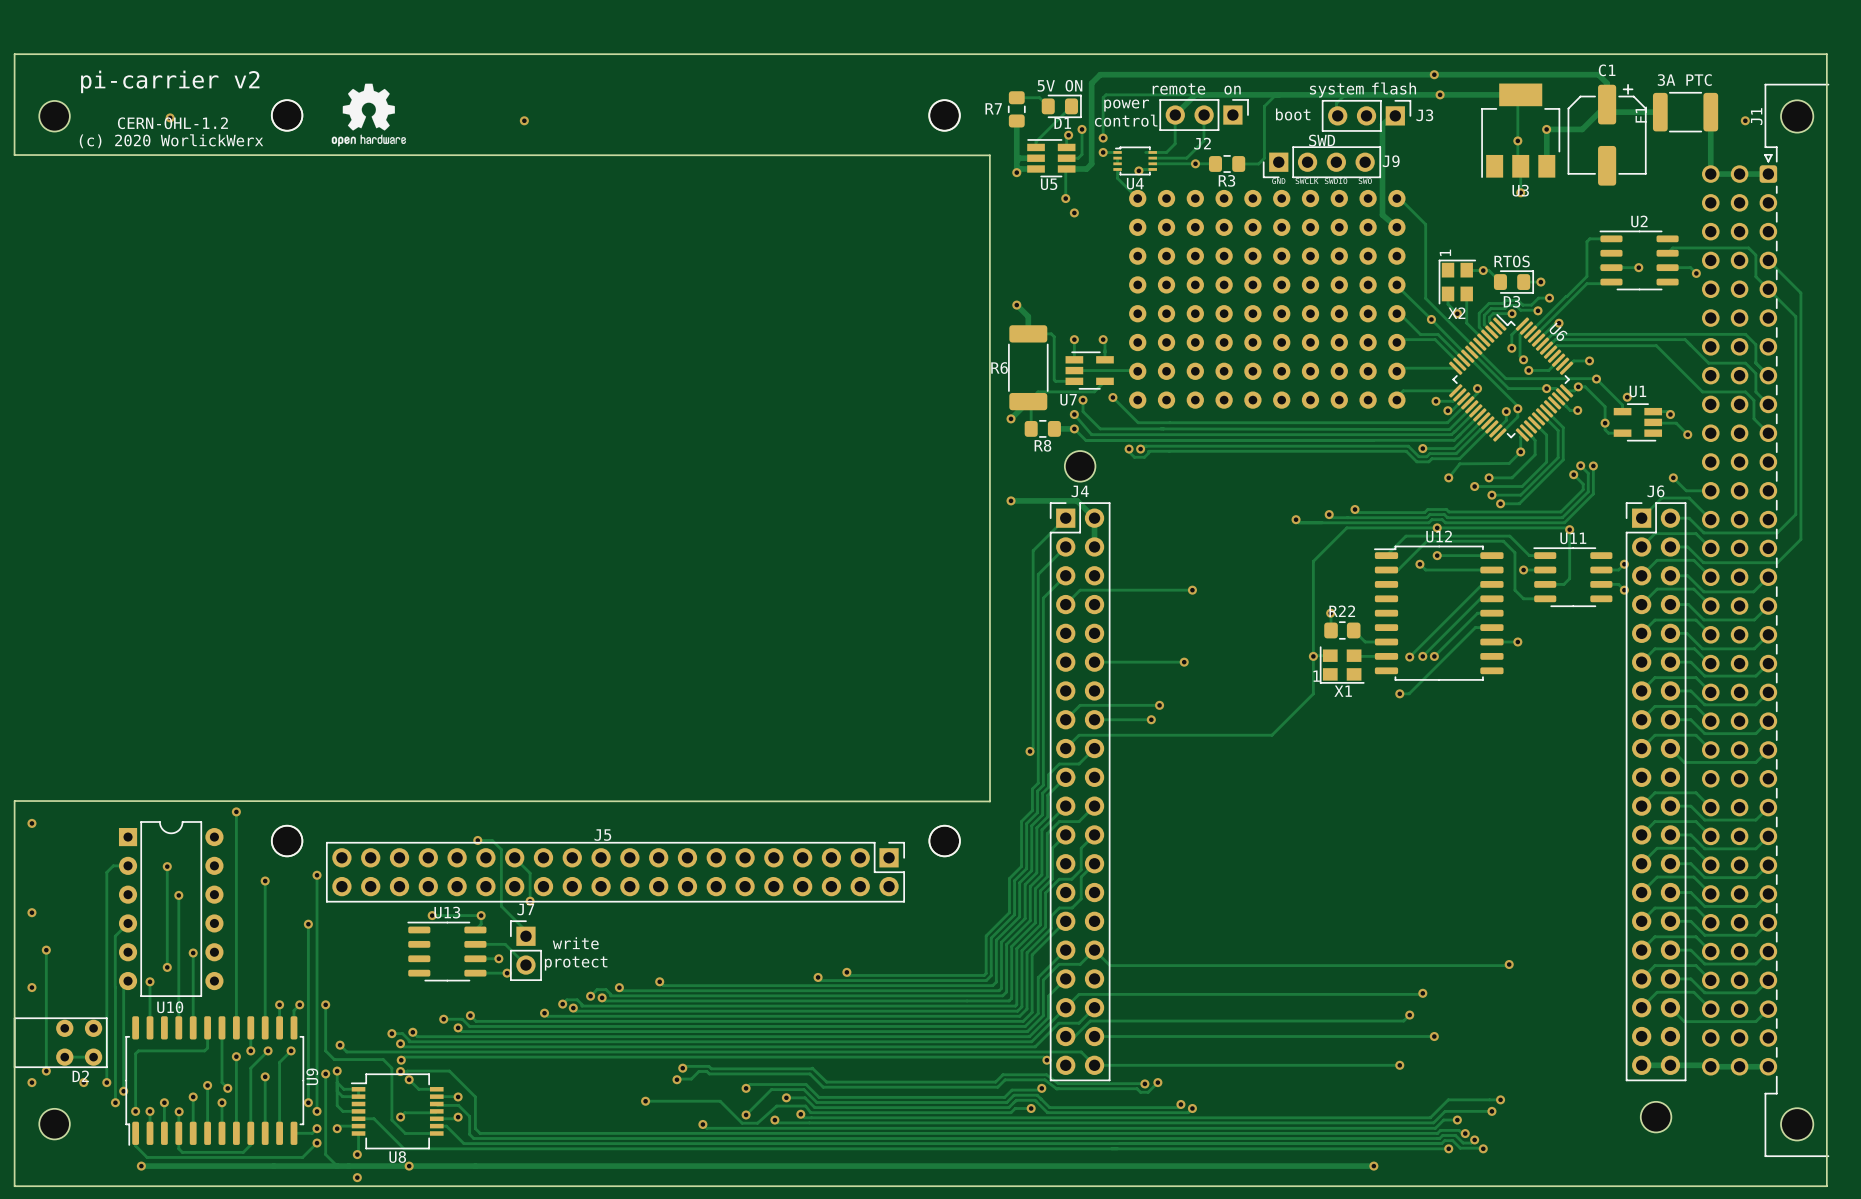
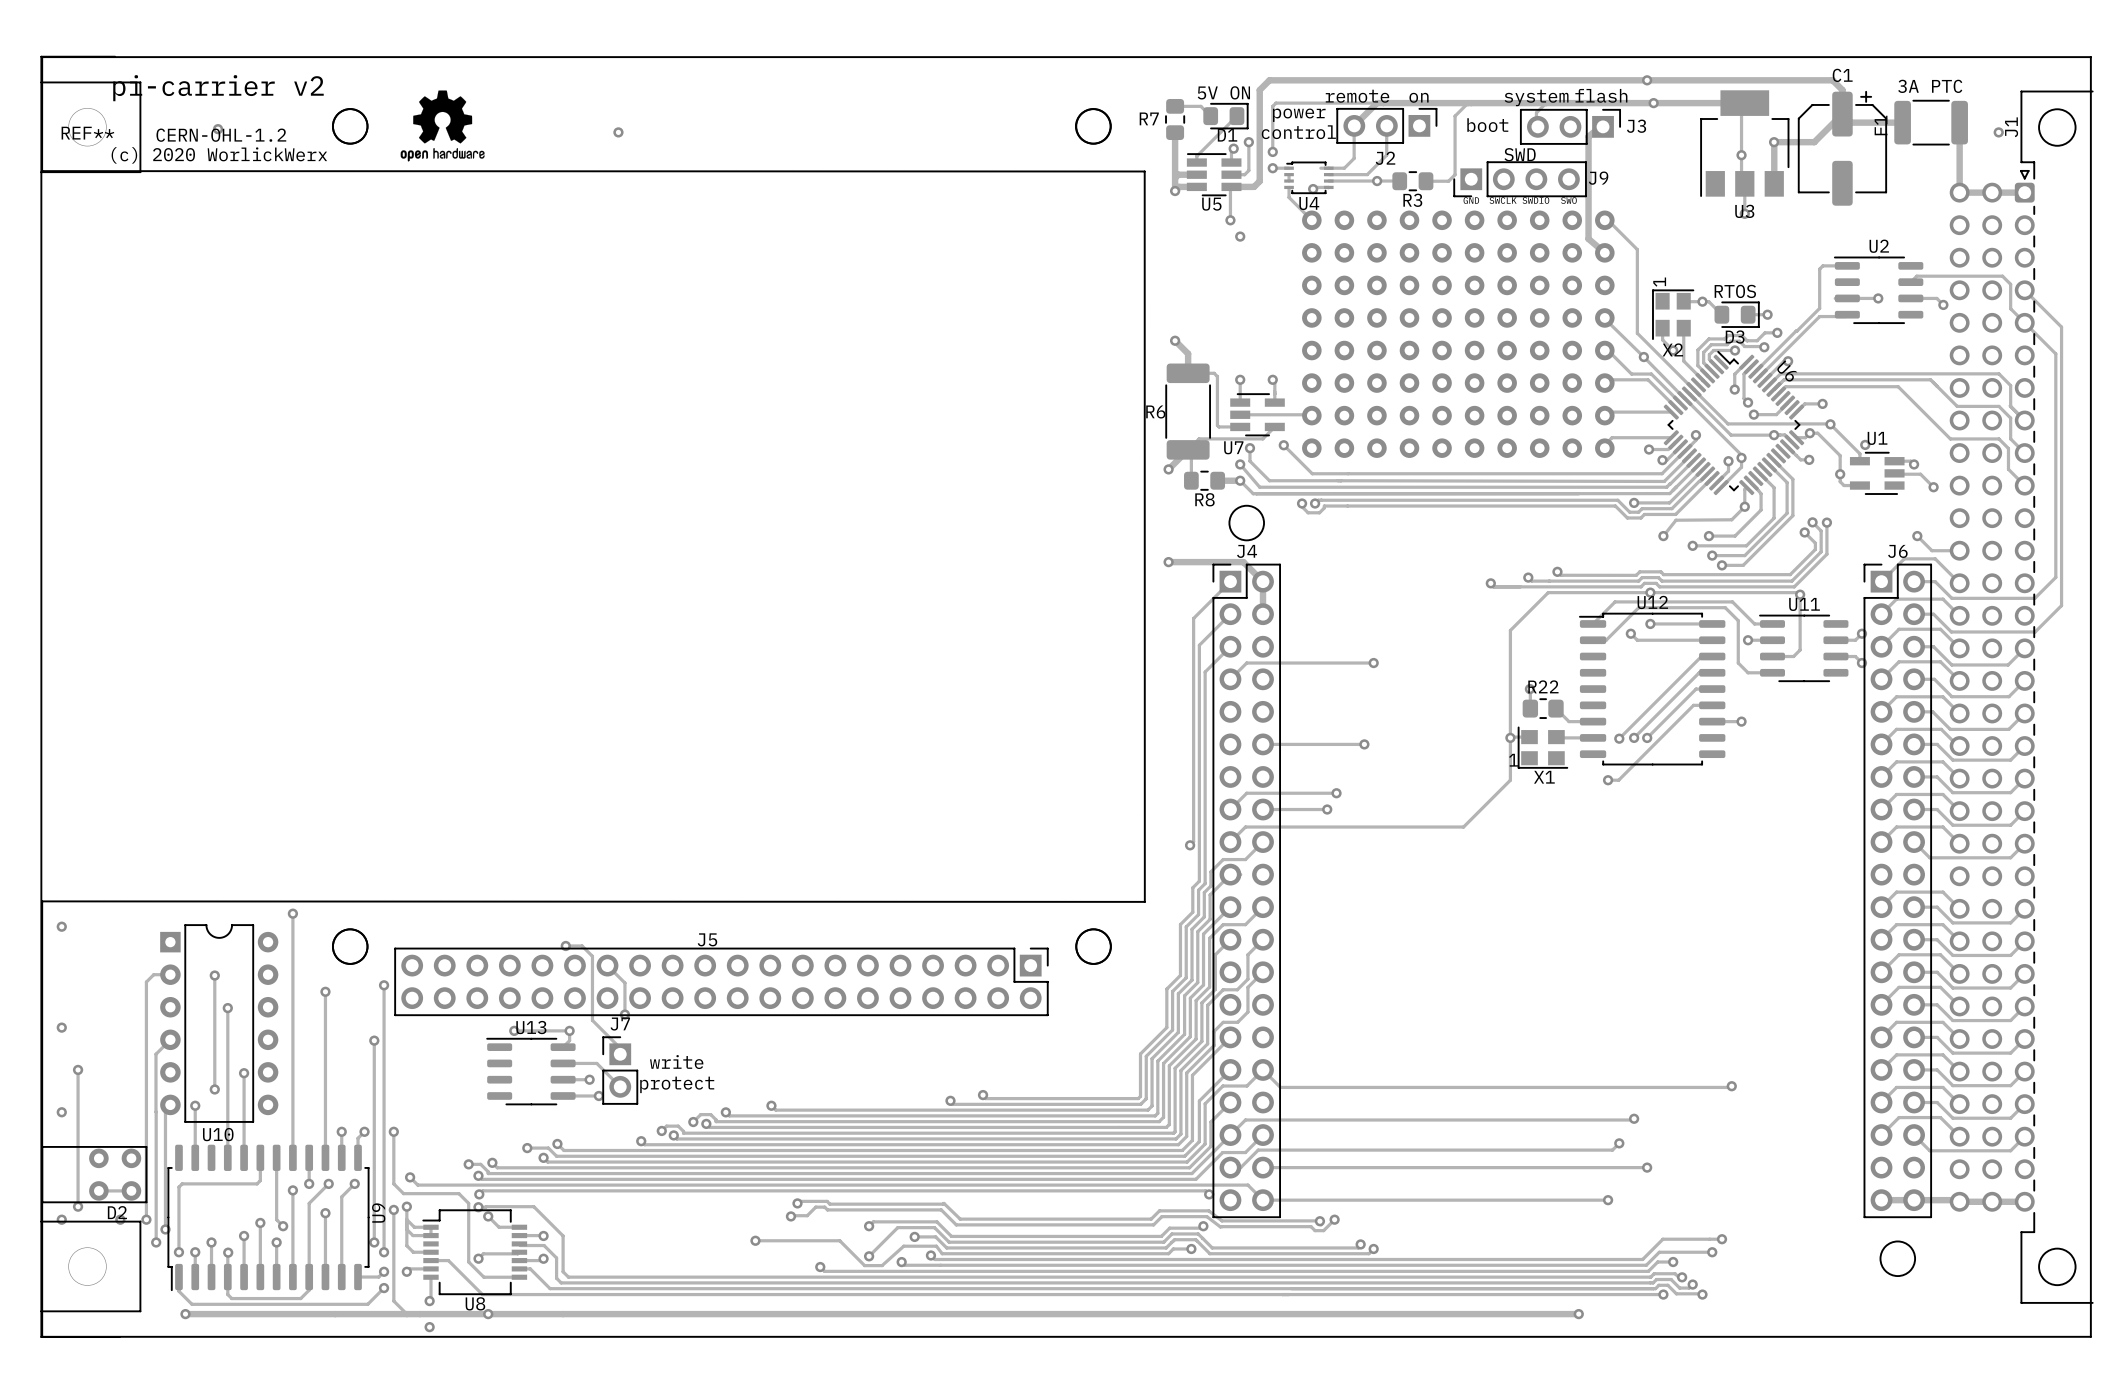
part: (54, 116) -> none
REF**: none -> (90, 696)
part: (54, 1124) -> none

